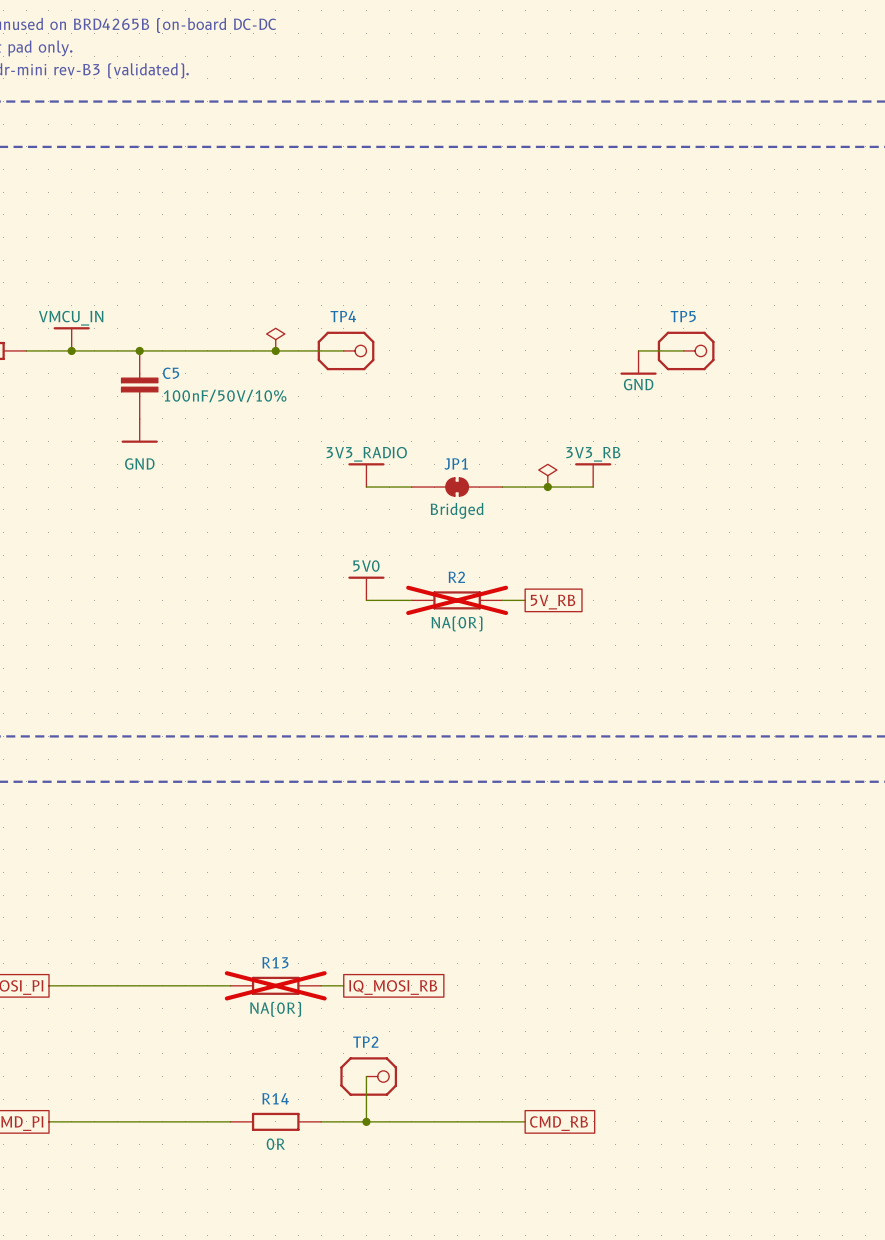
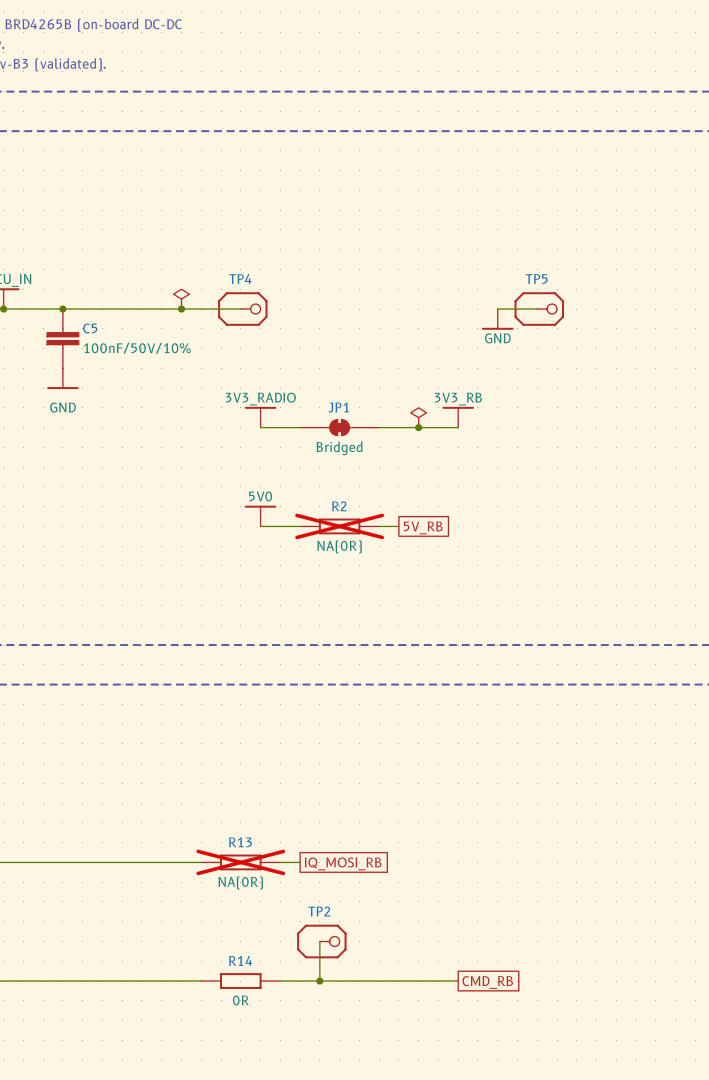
R13 position: (275, 985) -> (240, 862)
wire: (321, 985) (343, 985) -> (280, 862) (300, 862)
global label position: IQ_MOSI_RB (393, 987) -> IQ_MOSI_RB (343, 863)
wire: (366, 1076) (366, 1121) -> (319, 941) (319, 981)
TP2 position: (368, 1076) -> (321, 941)
R14 position: (275, 1121) -> (240, 981)
wire: (321, 1121) (389, 1121) -> (141, 981) (201, 981)
junction: (366, 1121) -> none
junction: none -> (319, 981)
wire: none -> (398, 981) (458, 981)
global label position: CMD_RB (558, 1123) -> CMD_RB (487, 982)

